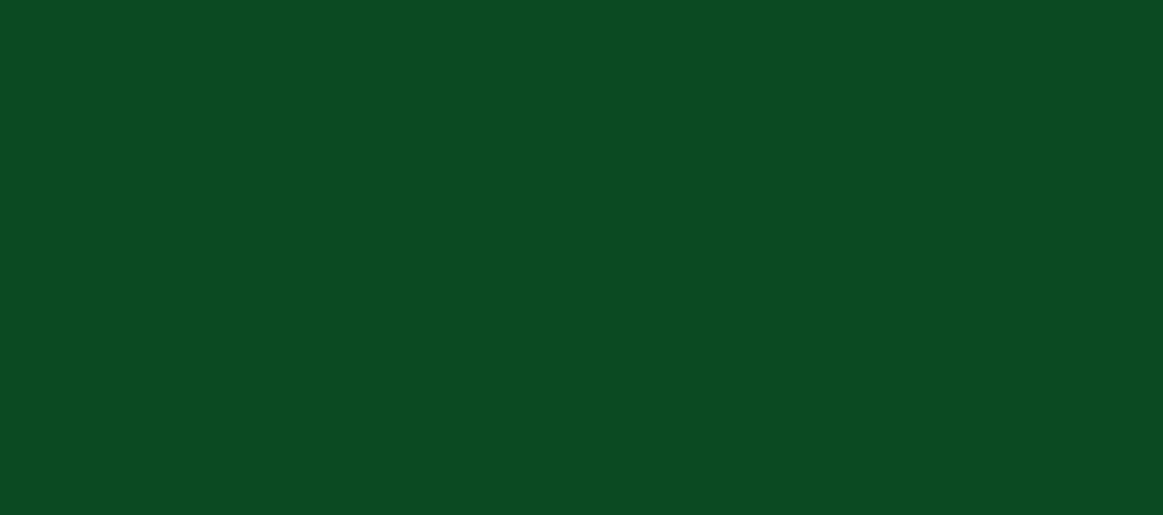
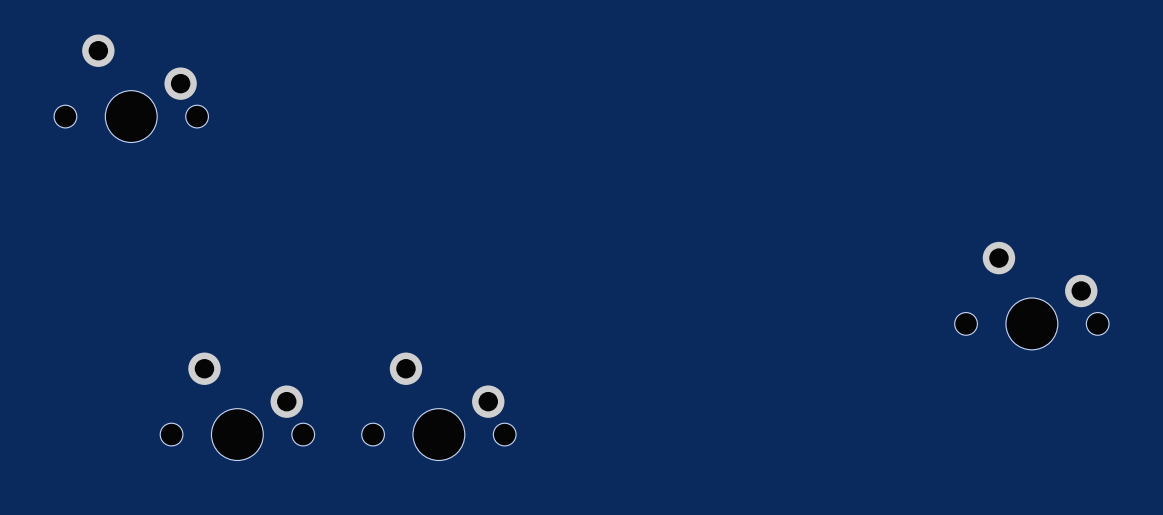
part: none -> (131, 88)
part: none -> (1031, 295)
part: none -> (237, 406)
part: none -> (438, 406)

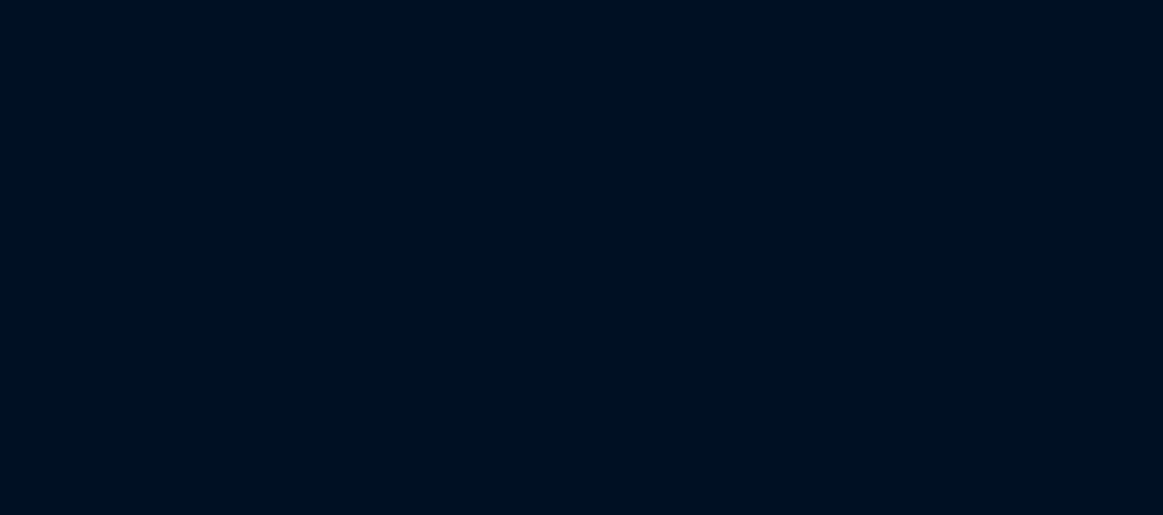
part: (131, 88) -> none
part: (1031, 295) -> none
part: (237, 406) -> none
part: (438, 406) -> none

